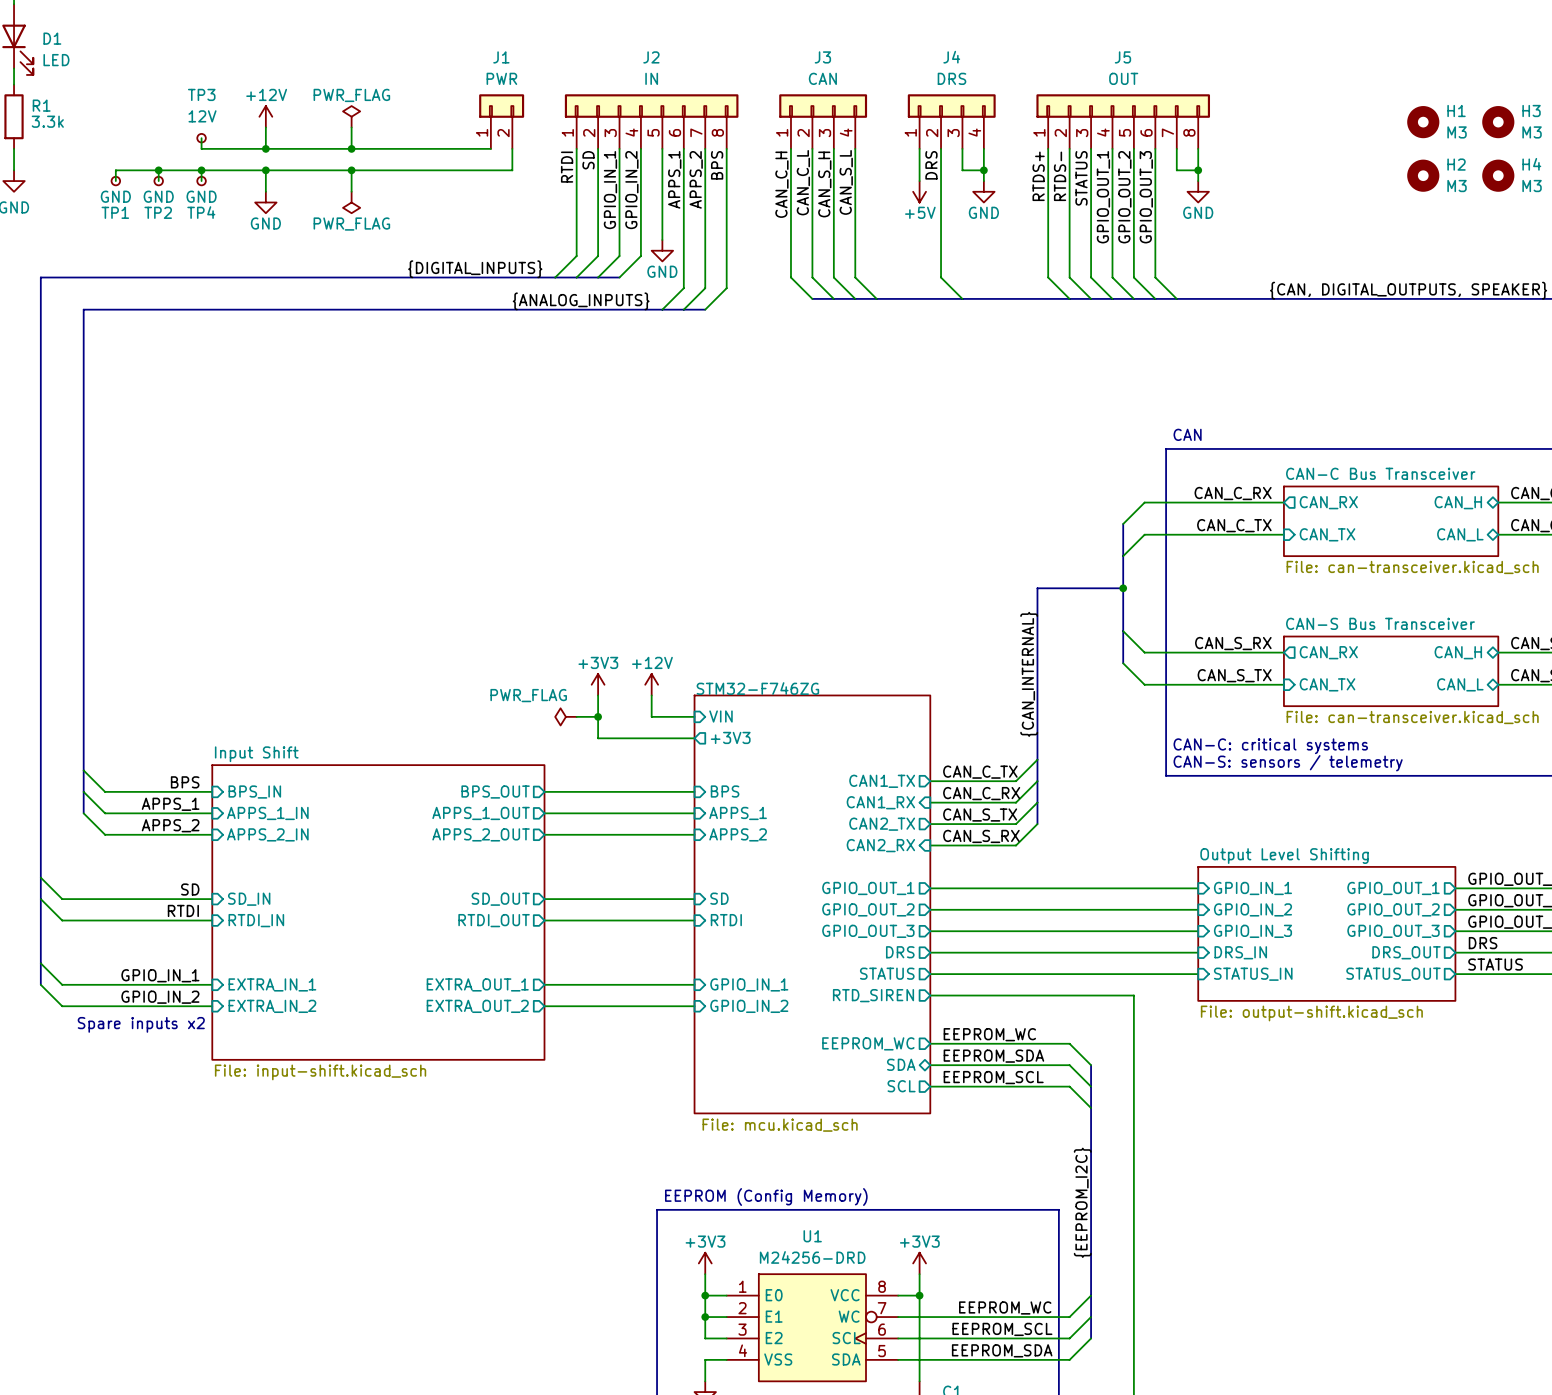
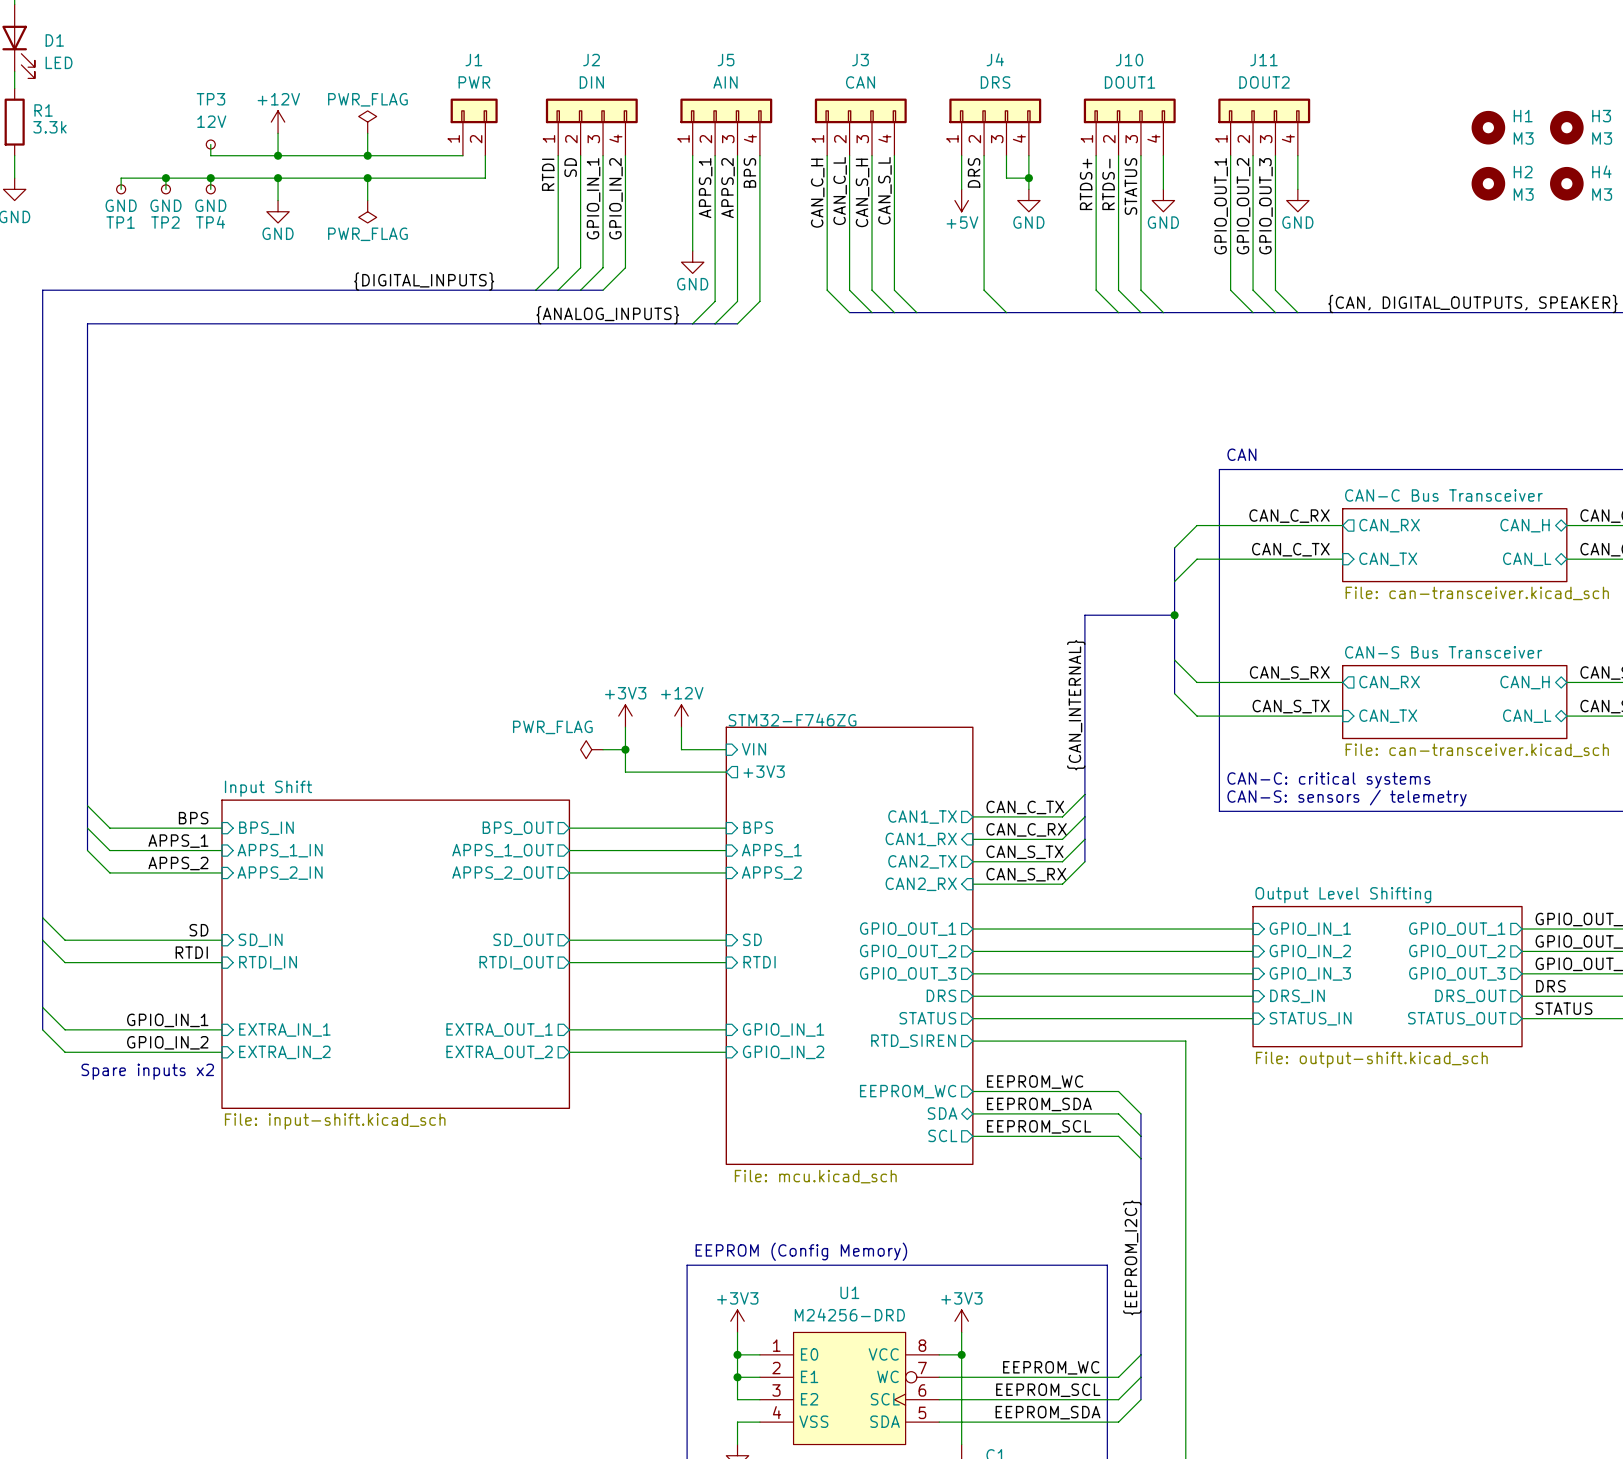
J2 value: IN (651, 78) -> DIN (591, 82)
J5 value: OUT (1123, 78) -> AIN (725, 82)
J2 symbol: [564, 94, 739, 149] -> [545, 98, 638, 156]
J5 symbol: [1036, 94, 1211, 149] -> [680, 98, 773, 156]
J1 position: (501, 121) -> (474, 127)
J10: none -> DOUT1 (1129, 127)
J11: none -> DOUT2 (1264, 127)
wire: (442, 148) (490, 148) -> none
wire: (512, 148) (512, 170) (464, 170) -> (485, 155) (485, 178)
wire: (619, 148) (619, 256) (598, 277) -> (558, 155) (558, 267) (535, 290)
wire: (640, 148) (640, 256) (619, 277) -> (580, 155) (580, 267) (558, 290)
wire: (1133, 148) (1133, 277) (1155, 298) -> (1275, 155) (1275, 290) (1297, 312)
wire: (1155, 148) (1155, 277) (1176, 298) -> none
wire: none -> (1297, 155) (1297, 189)
label: none -> SD (570, 167)
label: SD (588, 160) -> GPIO_IN_2 (615, 198)
label: none -> RTDI (548, 174)
label: RTDI (567, 167) -> GPIO_IN_1 (593, 198)
wire: (1176, 170) (1198, 170) -> (1230, 178) (1230, 290) (1253, 312)
junction: (1198, 170) -> none
wire: (1112, 181) (1112, 277) (1133, 298) -> (1253, 189) (1253, 290) (1275, 312)
label: GPIO_IN_1 (610, 190) -> none
label: GPIO_IN_2 (631, 190) -> none
power symbol: none -> GND (1163, 200)
power symbol: GND (1198, 191) -> none
power symbol: none -> GND (1297, 200)
label position: GPIO_OUT_1 (1103, 197) -> GPIO_OUT_1 (1221, 206)
label position: GPIO_OUT_2 (1124, 197) -> GPIO_OUT_2 (1243, 206)
label position: GPIO_OUT_3 (1146, 197) -> GPIO_OUT_3 (1265, 206)
label position: {DIGITAL_INPUTS} (475, 269) -> {DIGITAL_INPUTS} (424, 281)
bus: (576, 277) (619, 277) -> none

